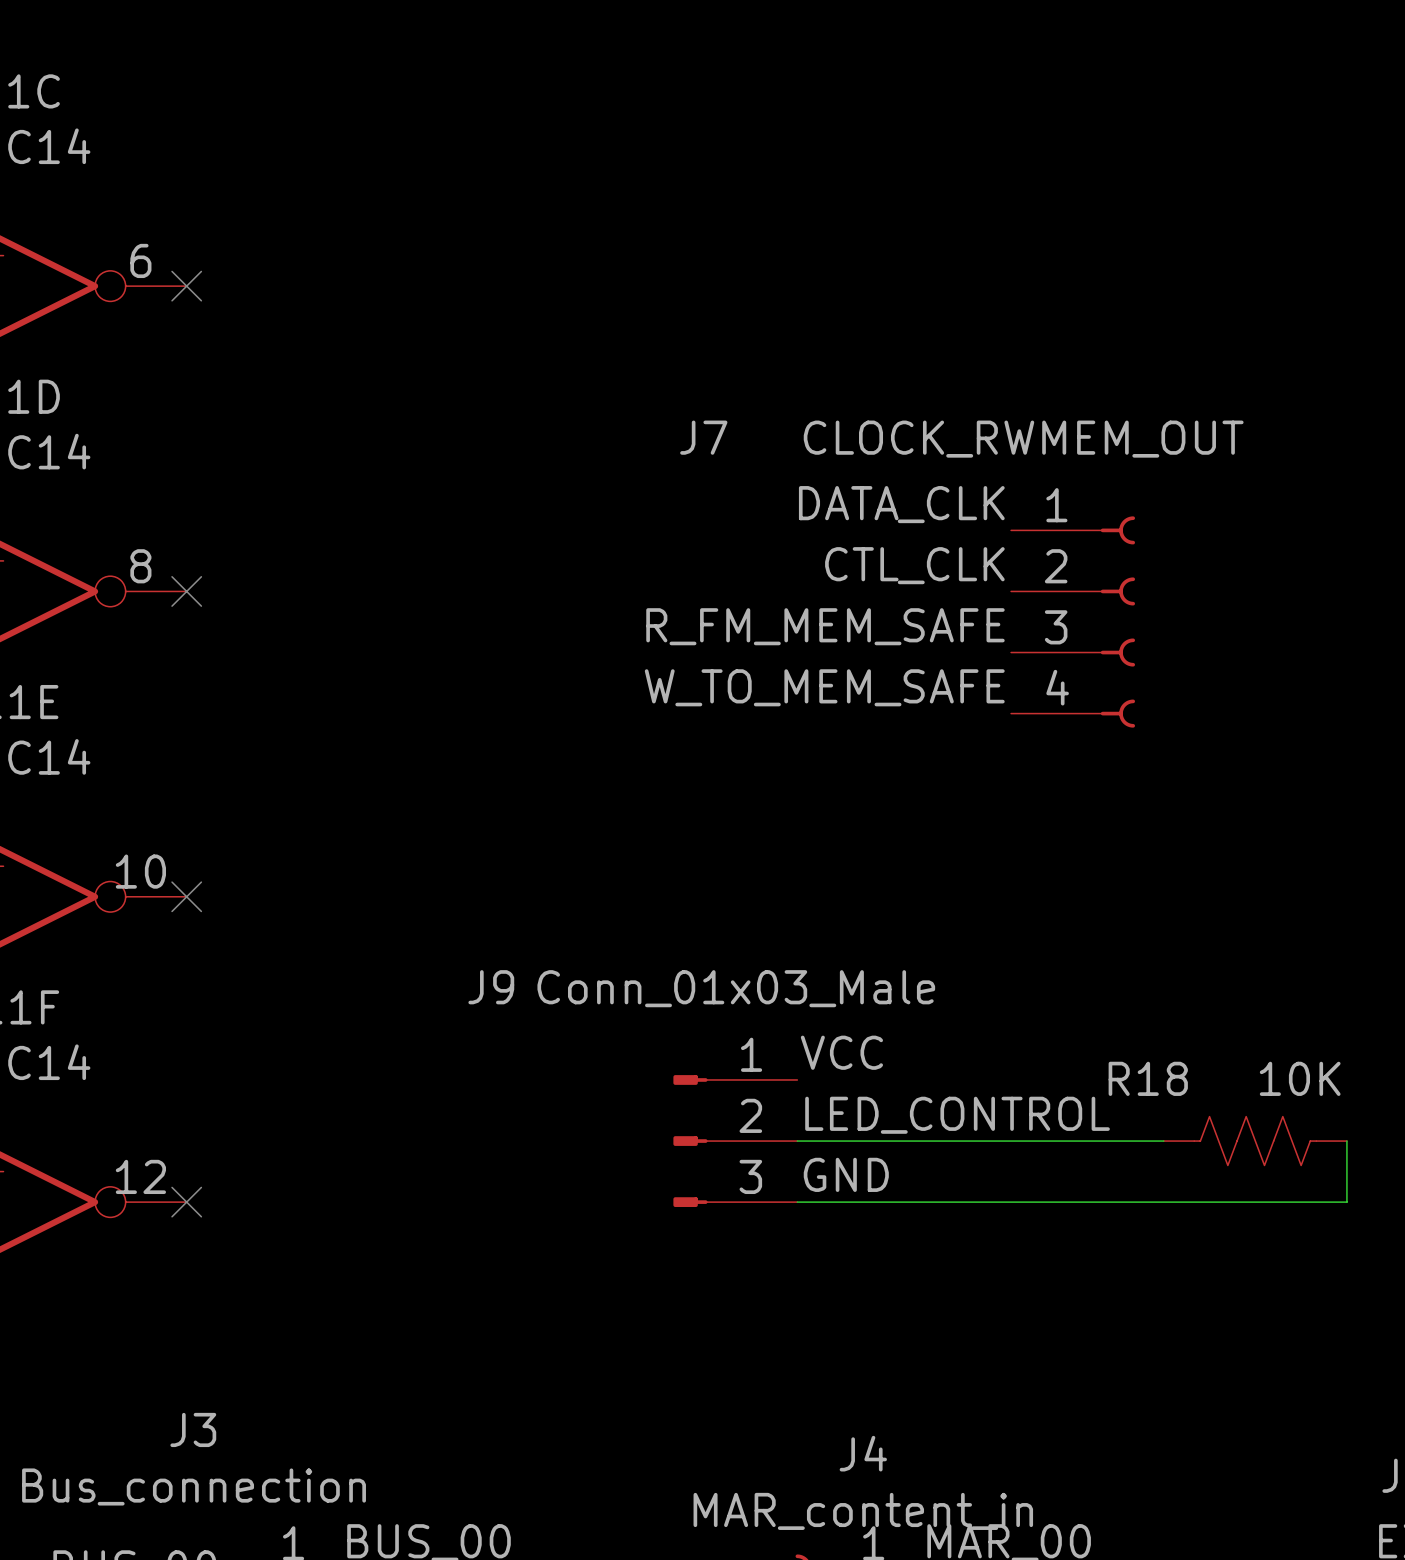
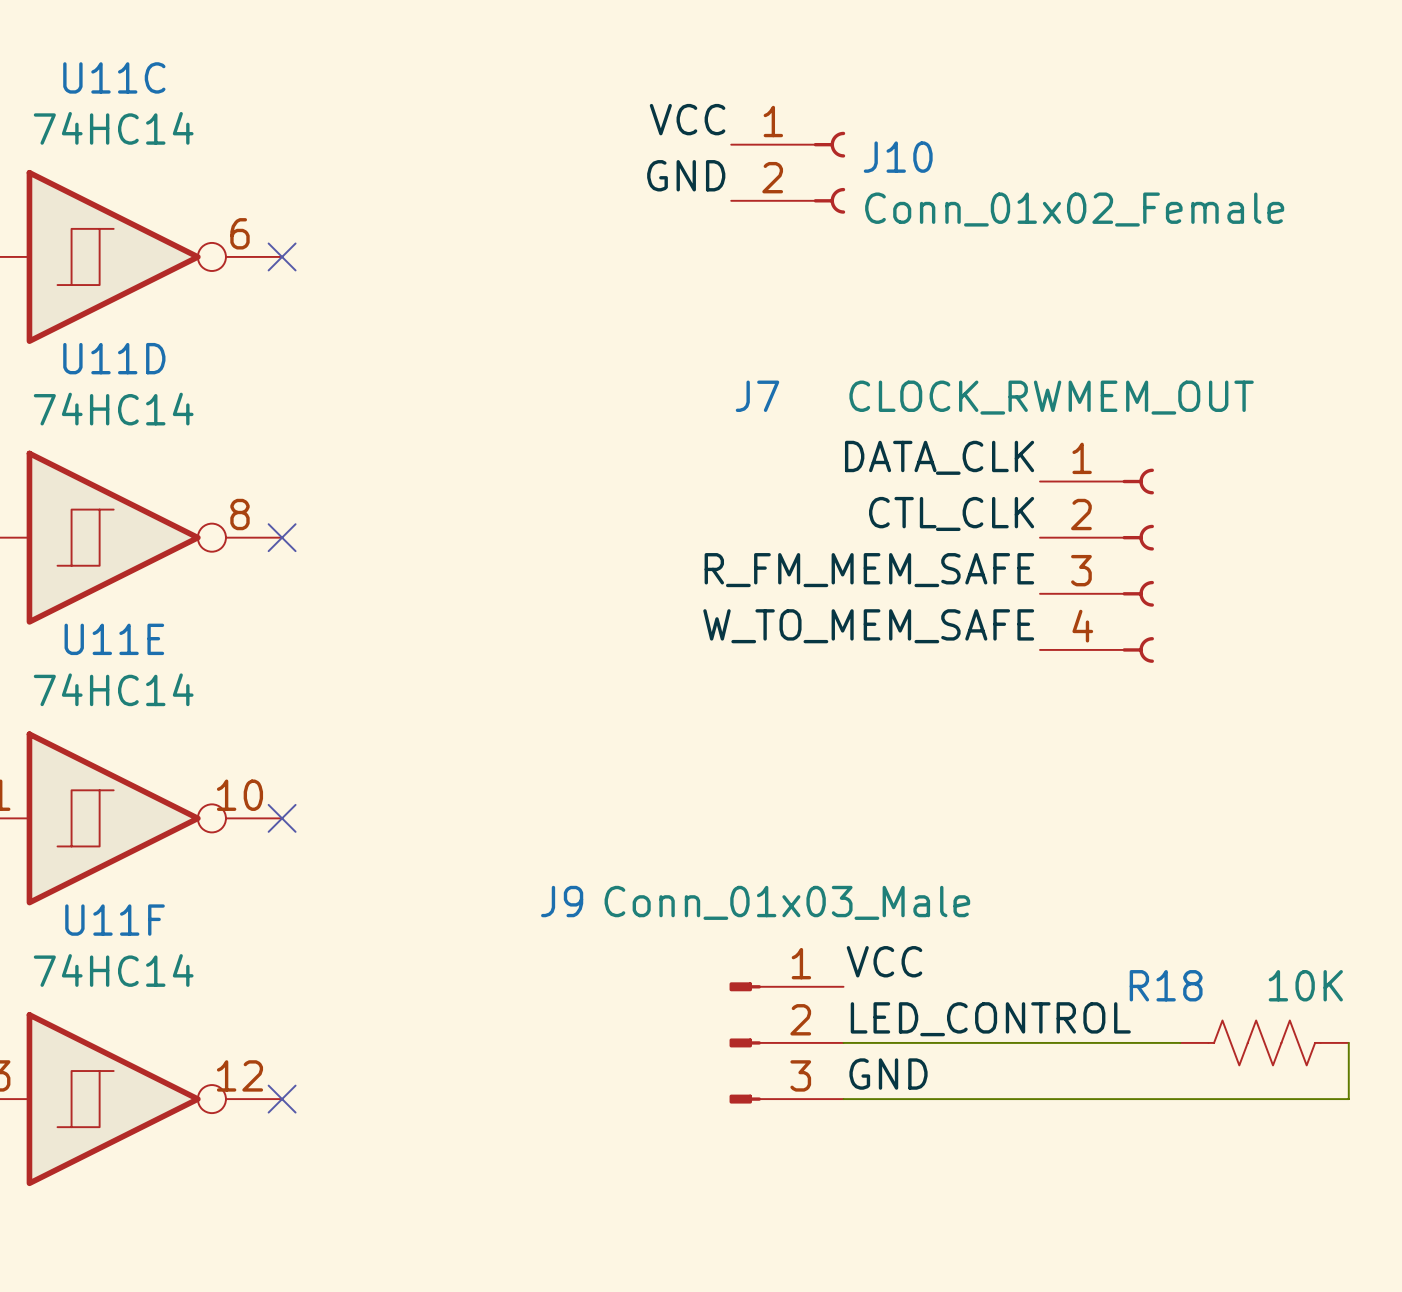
label: none -> VCC (687, 119)
J10: none -> Conn_01x02_Female (788, 172)
label: none -> GND (686, 175)

